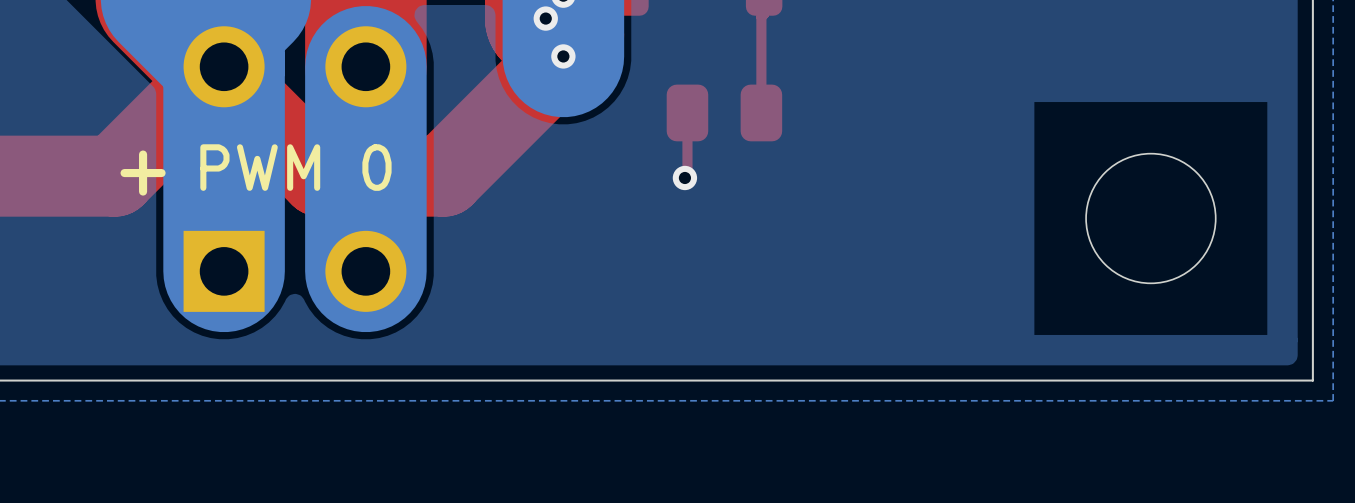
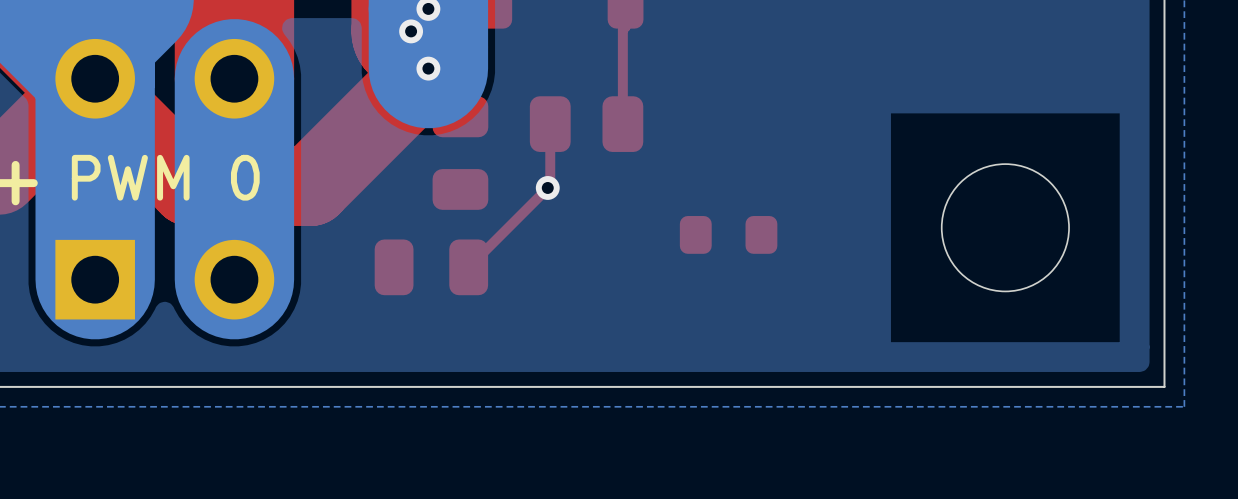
part: none -> (460, 153)
top track: none -> (550, 185) (468, 267)
part: none -> (728, 234)
part: none -> (431, 267)

